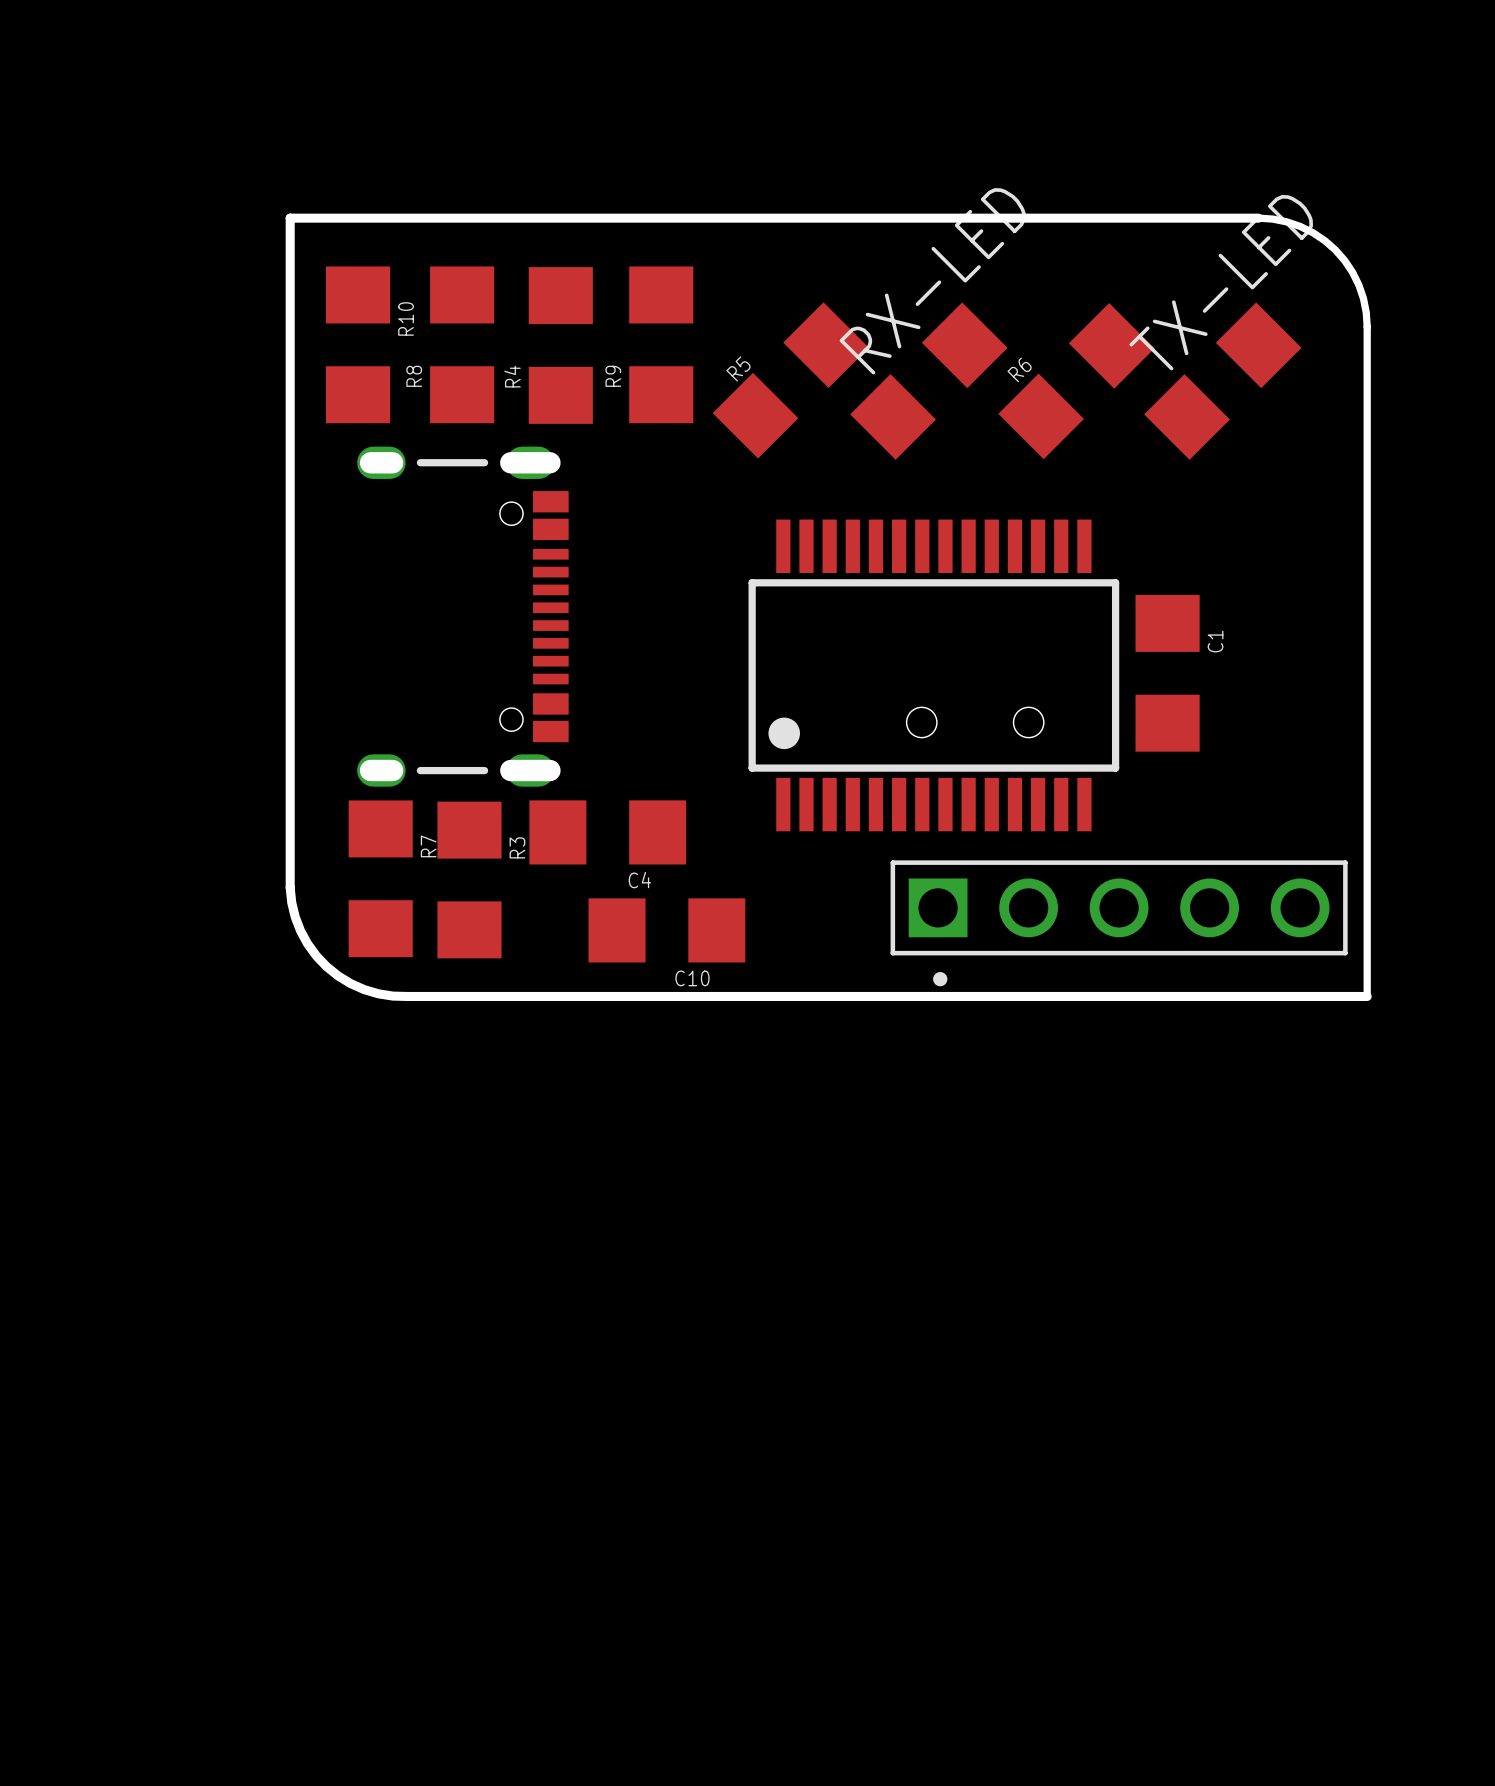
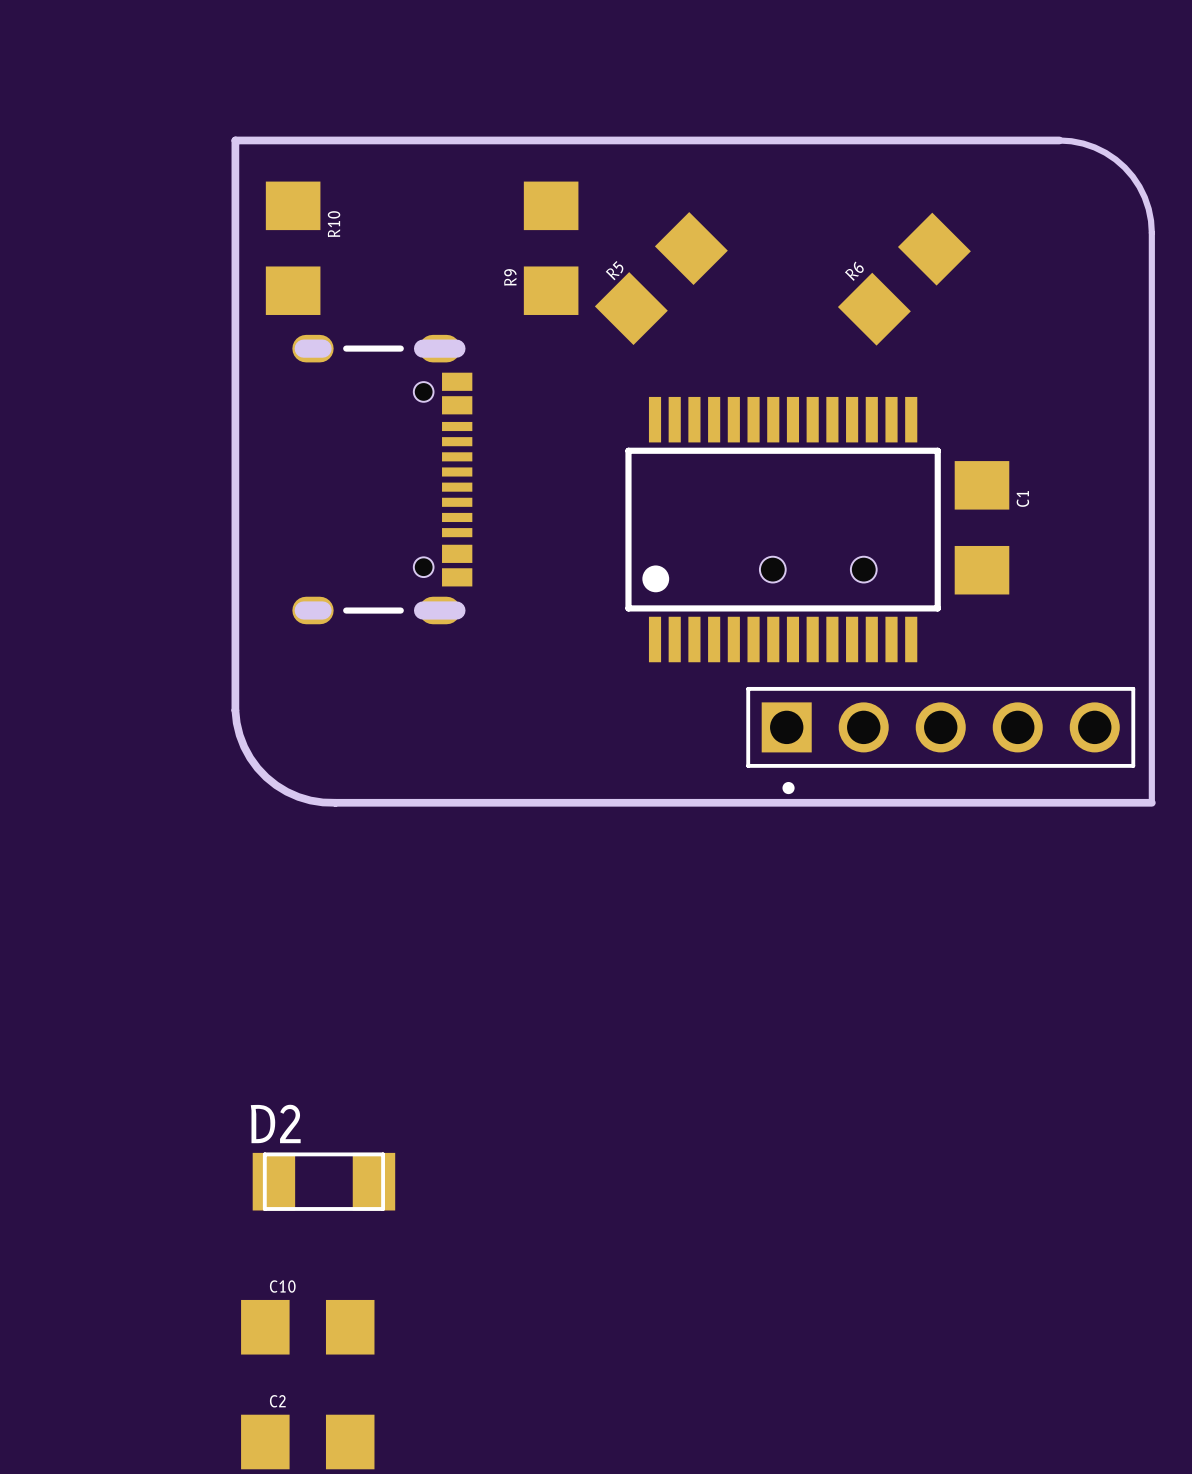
R8: (462, 344) -> none
R4: (560, 345) -> none
RX-LED: (928, 381) -> none
TX-LED: (1222, 381) -> none
C4: (607, 832) -> none
R7: (380, 878) -> none
R3: (469, 880) -> none
C10 position: (666, 930) -> (307, 1327)
C10 name position: C10 (692, 978) -> C10 (282, 1286)
D2: none -> (323, 1181)
C2: none -> (307, 1442)

